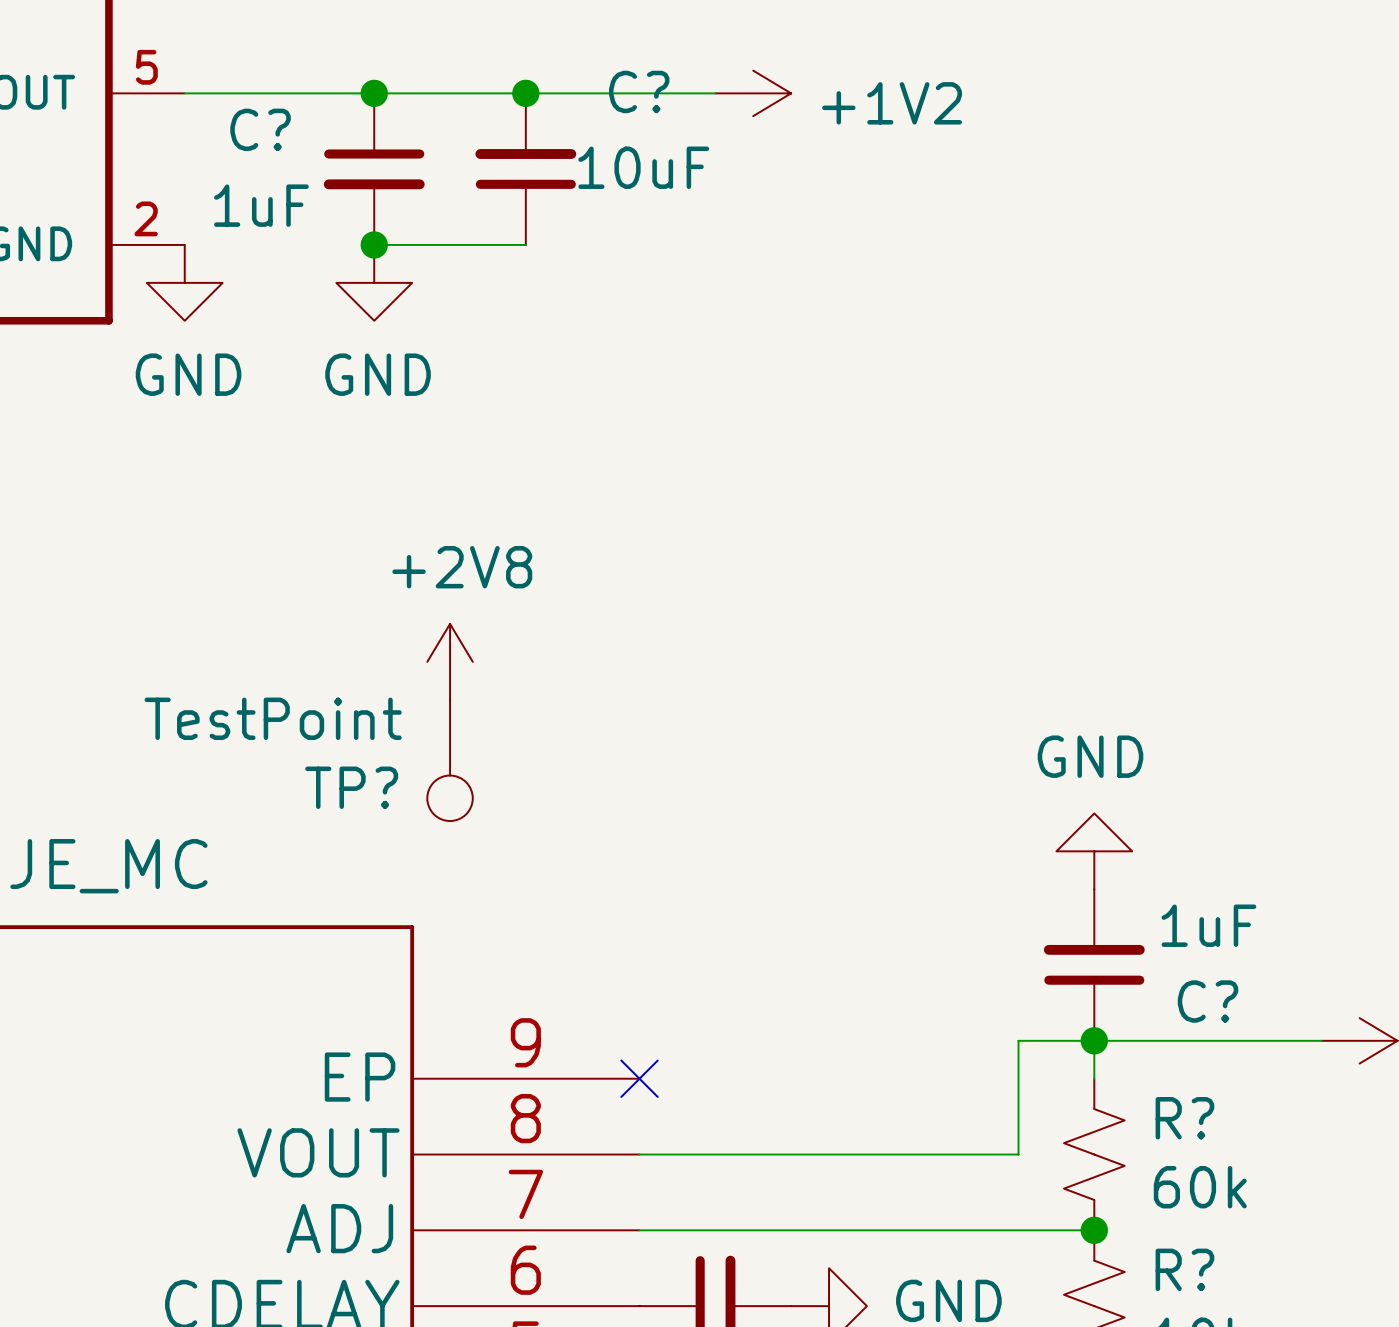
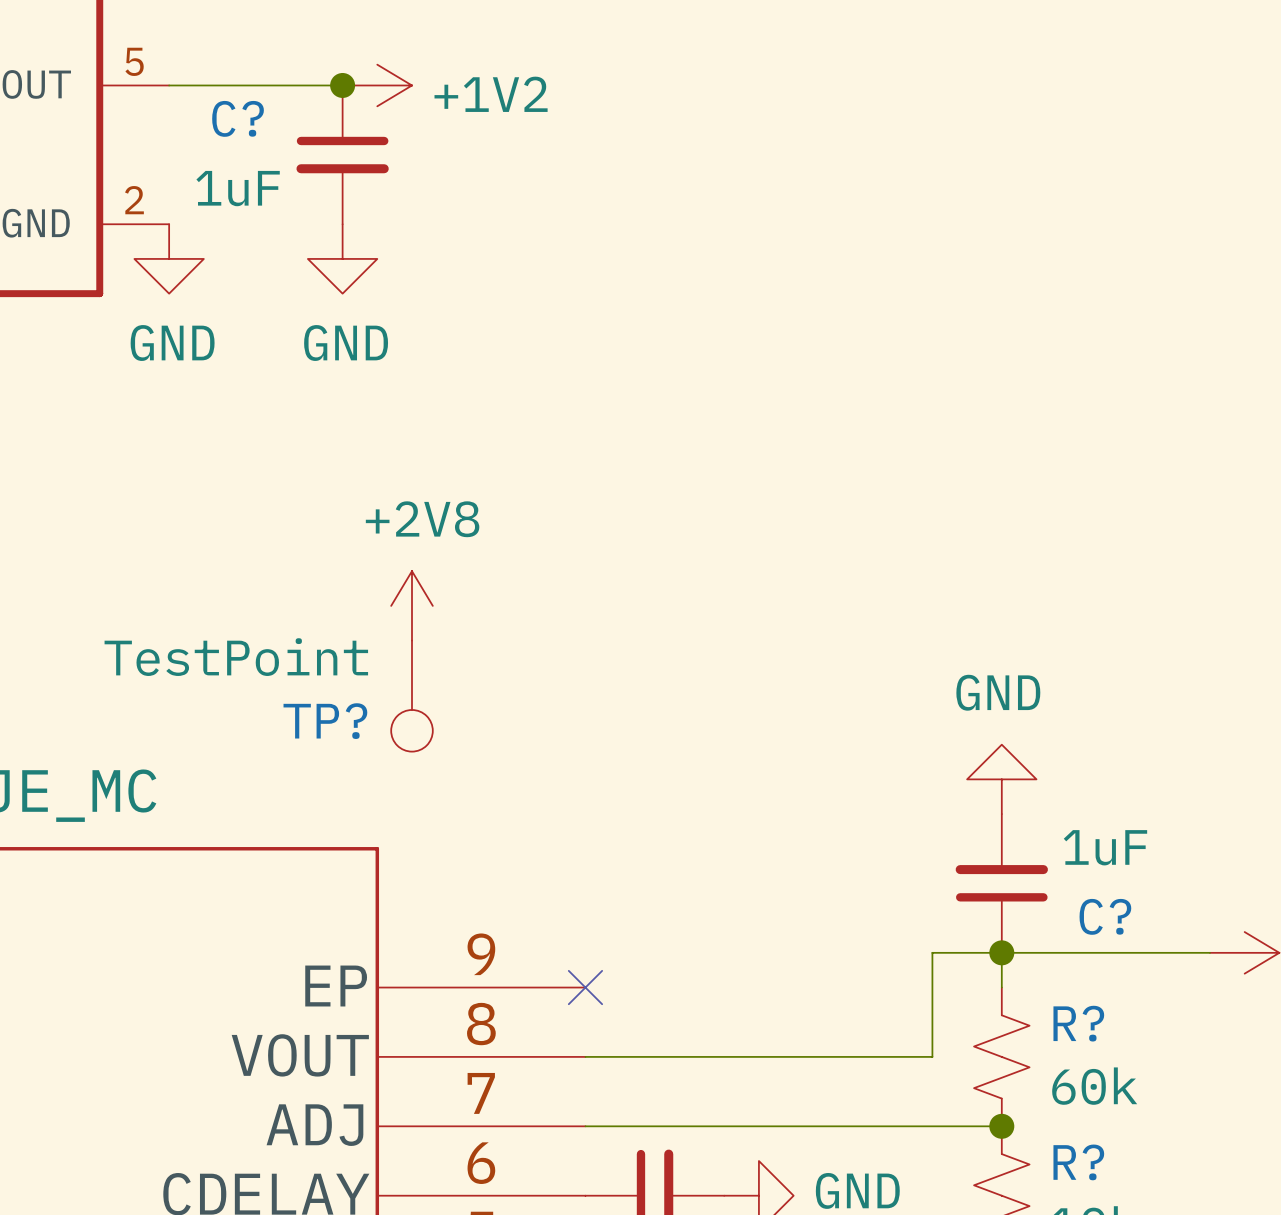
wire: (374, 93) (715, 93) -> none
junction: (525, 93) -> none
power symbol position: +1V2 (753, 93) -> +1V2 (377, 85)
C?: 10uF (525, 169) -> none
wire: (374, 244) (525, 244) -> none
junction: (374, 244) -> none

